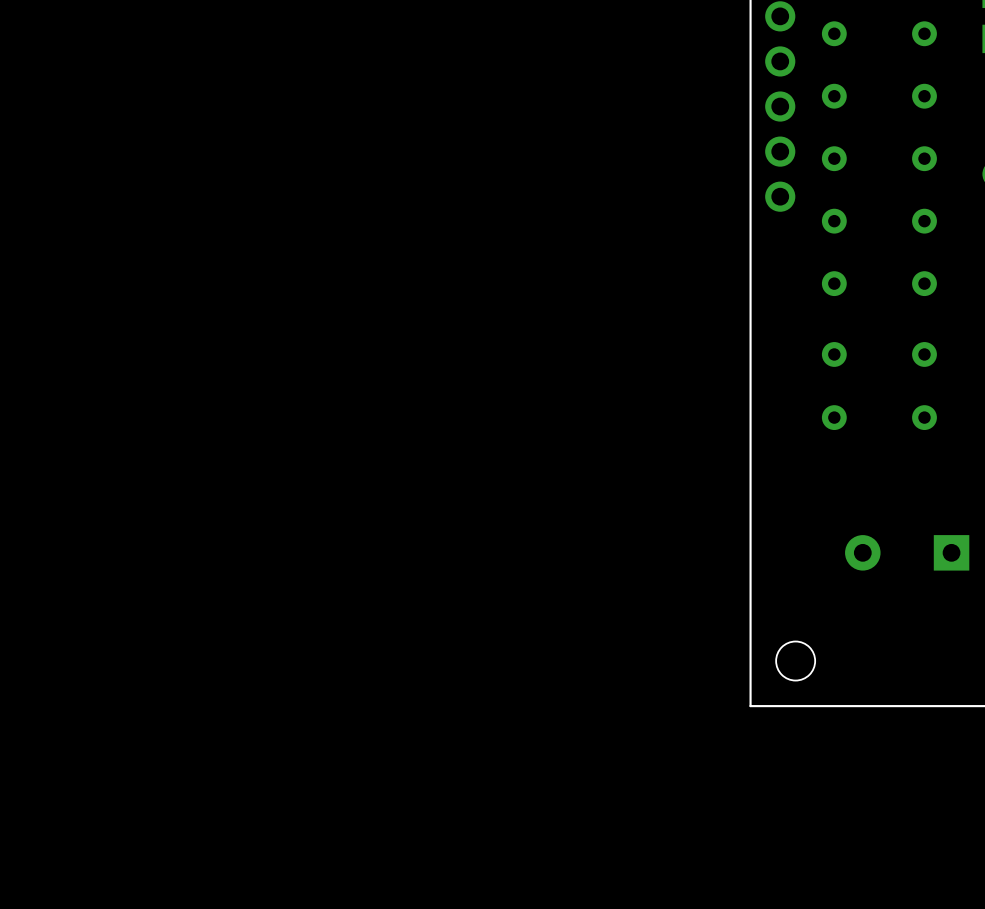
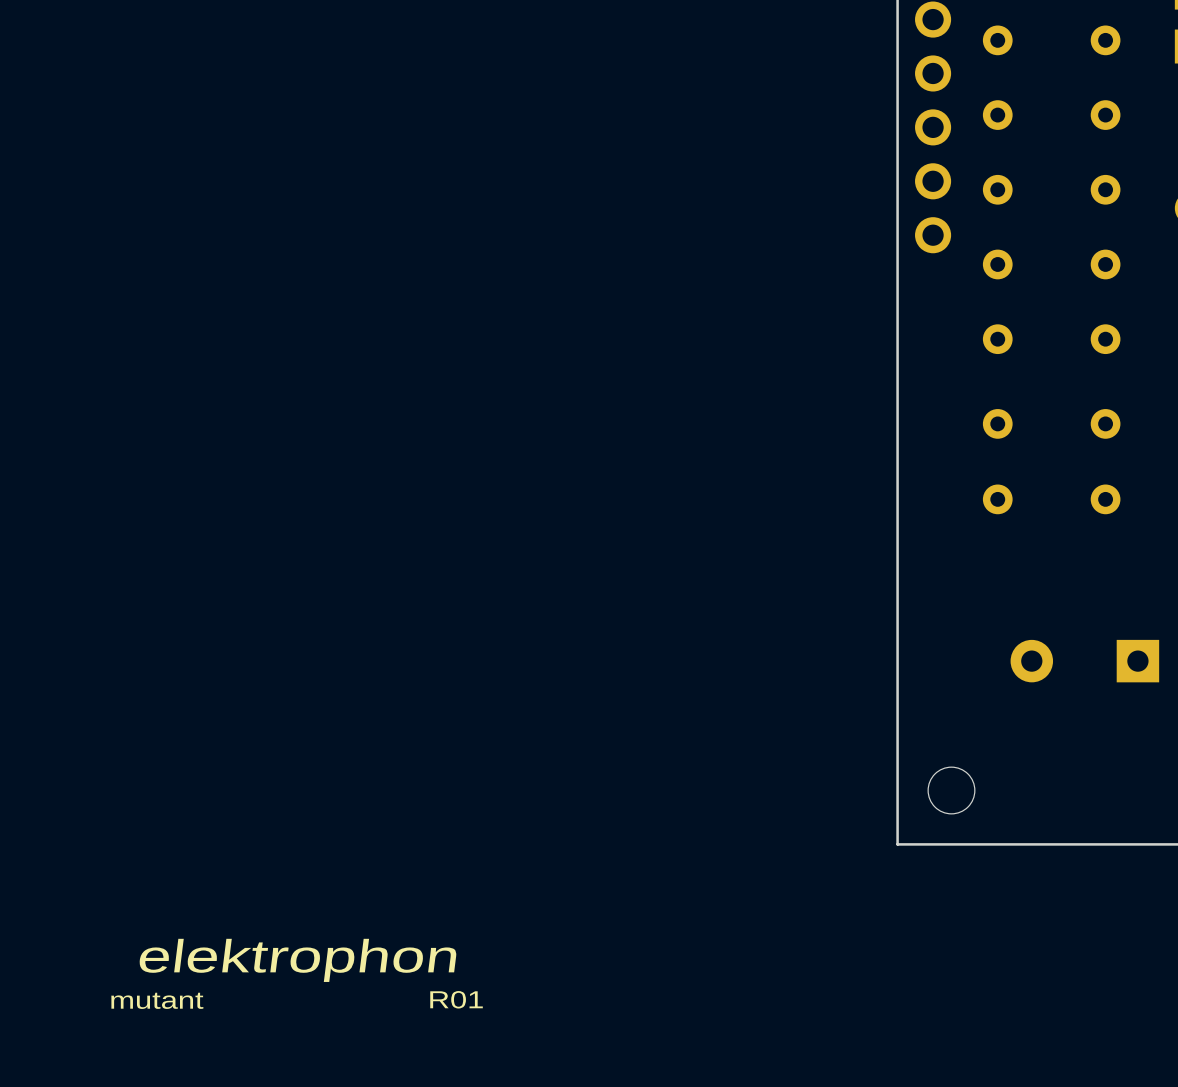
drawing: none -> [111, 938, 483, 1009]

